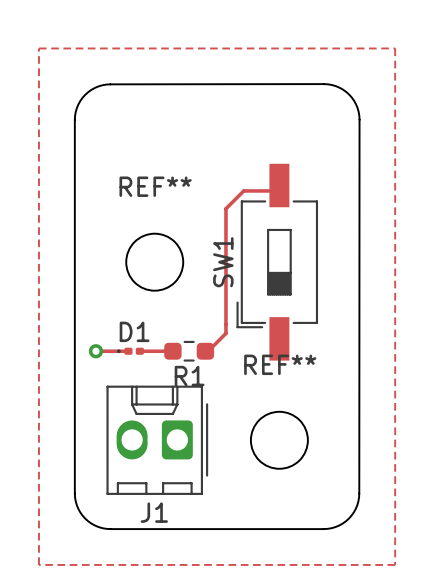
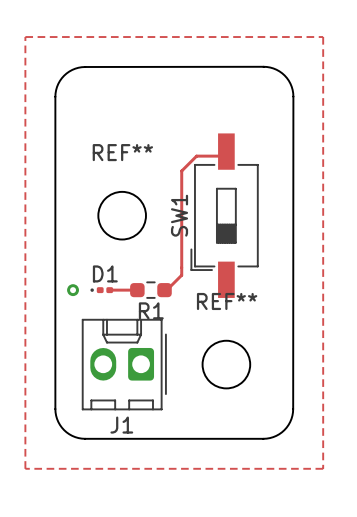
track: (97, 351) (124, 351) -> none

